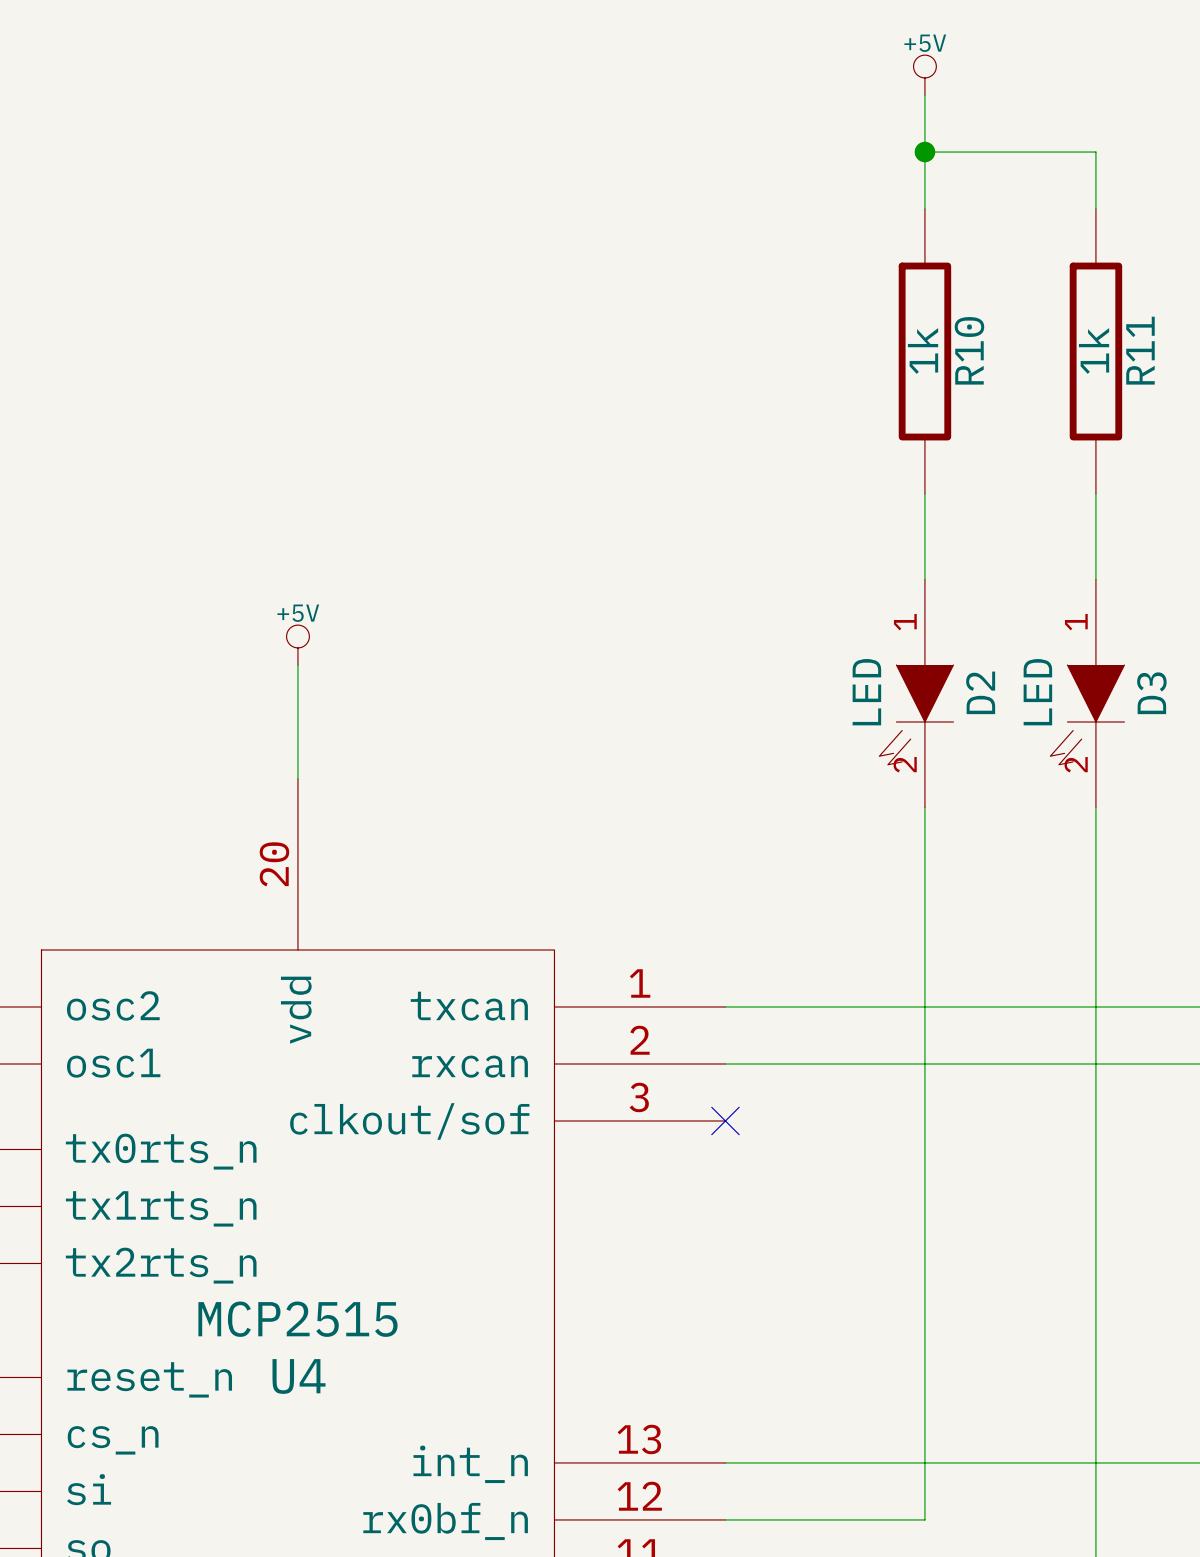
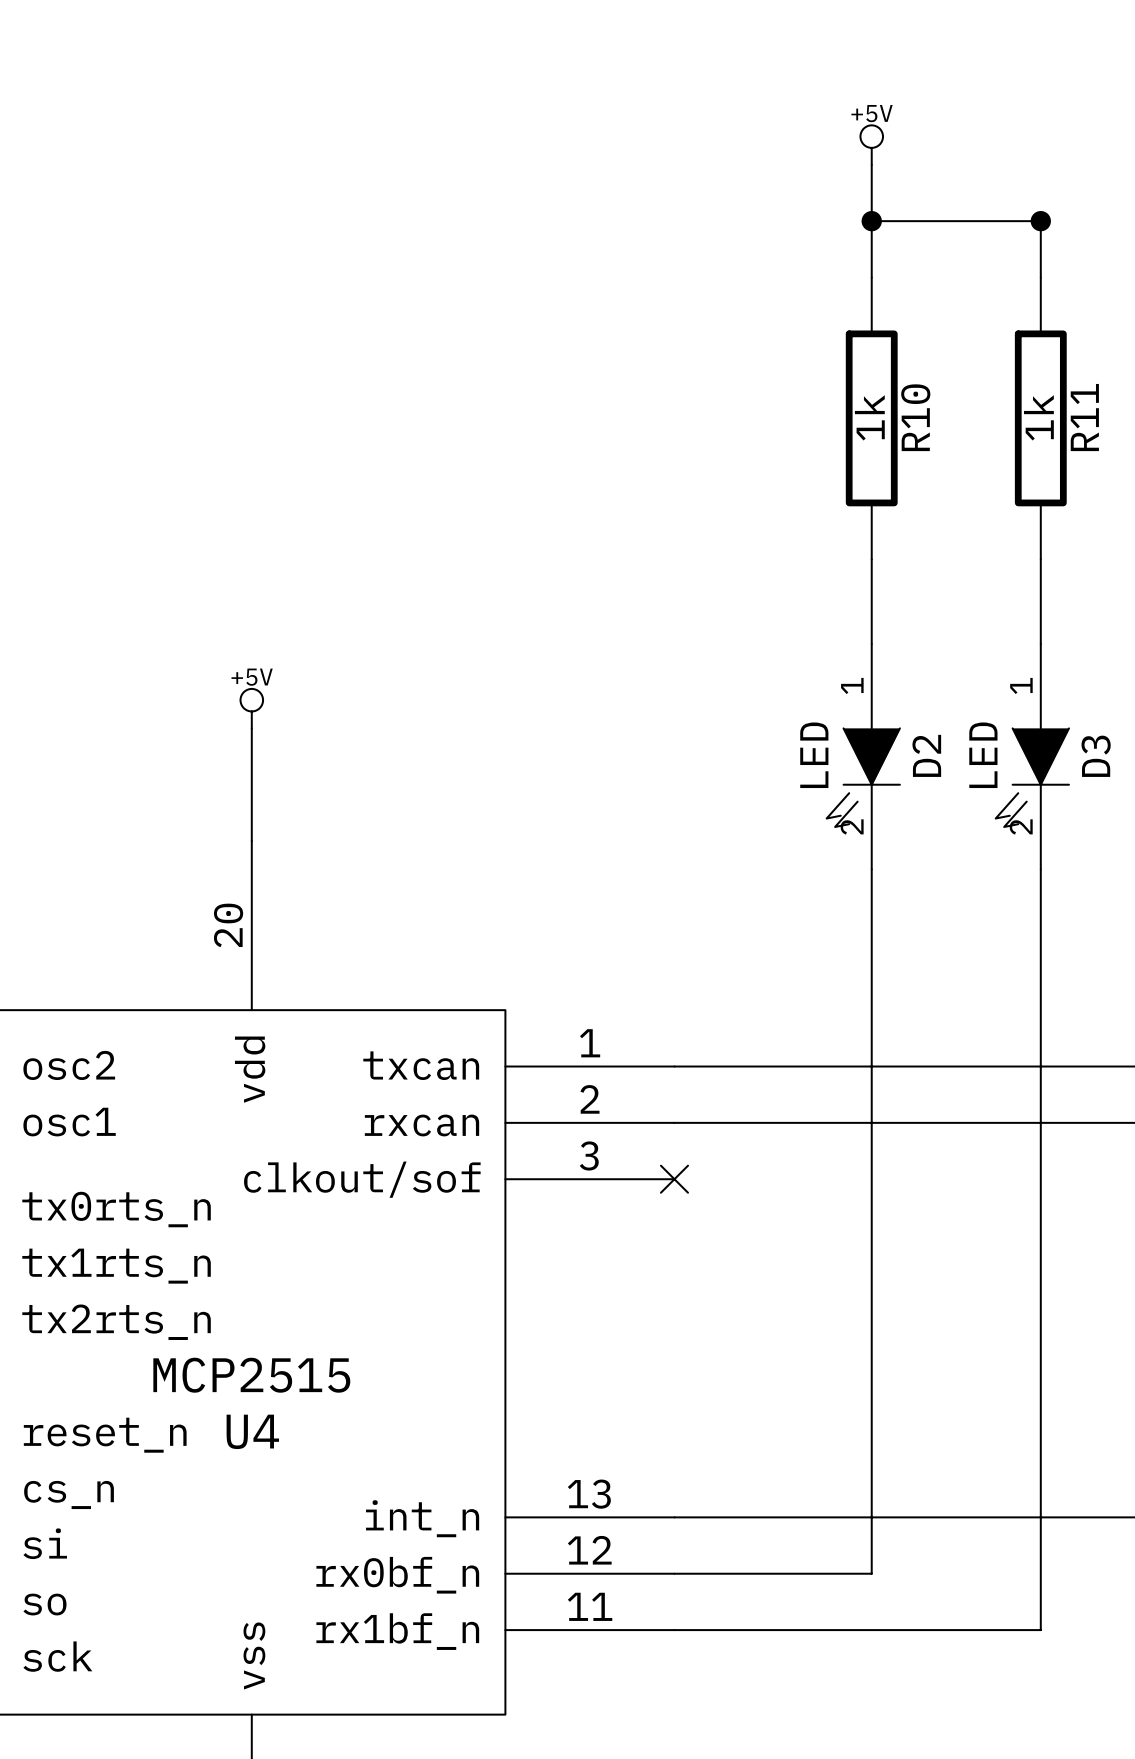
junction: none -> (1040, 221)

